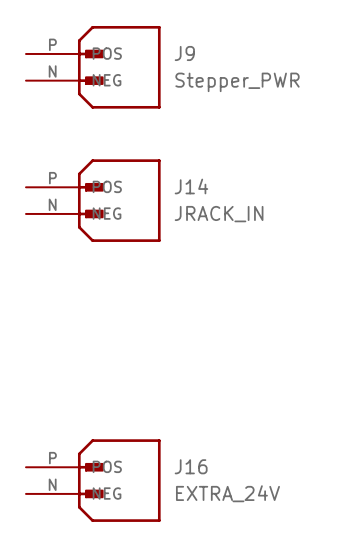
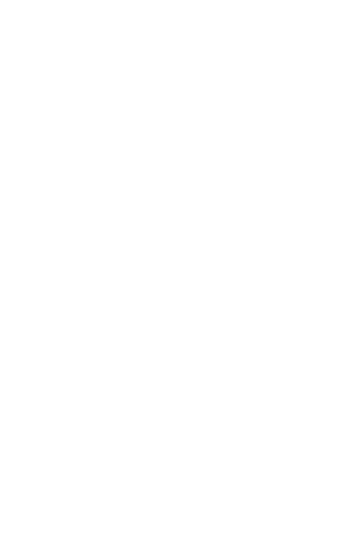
J9: Stepper_PWR (93, 67) -> none
J14: JRACK_IN (93, 200) -> none
J16: EXTRA_24V (93, 480) -> none

